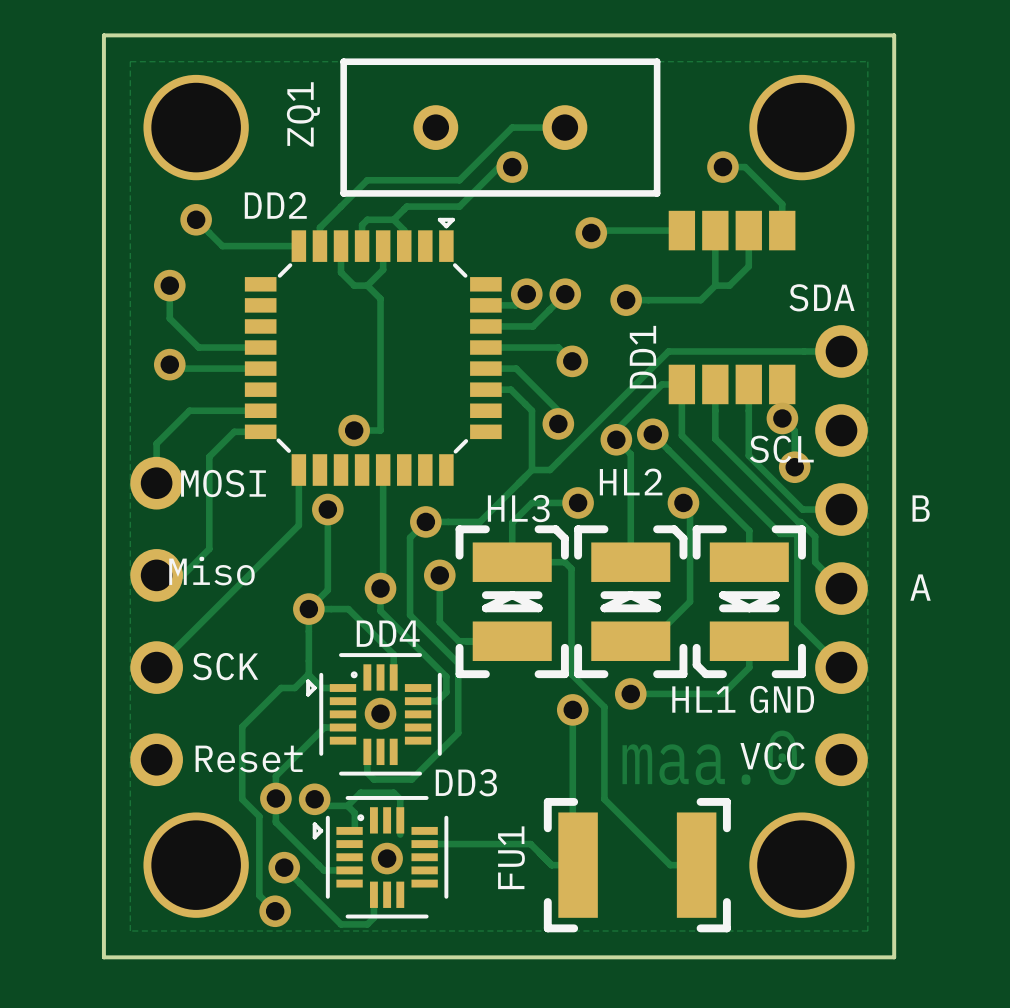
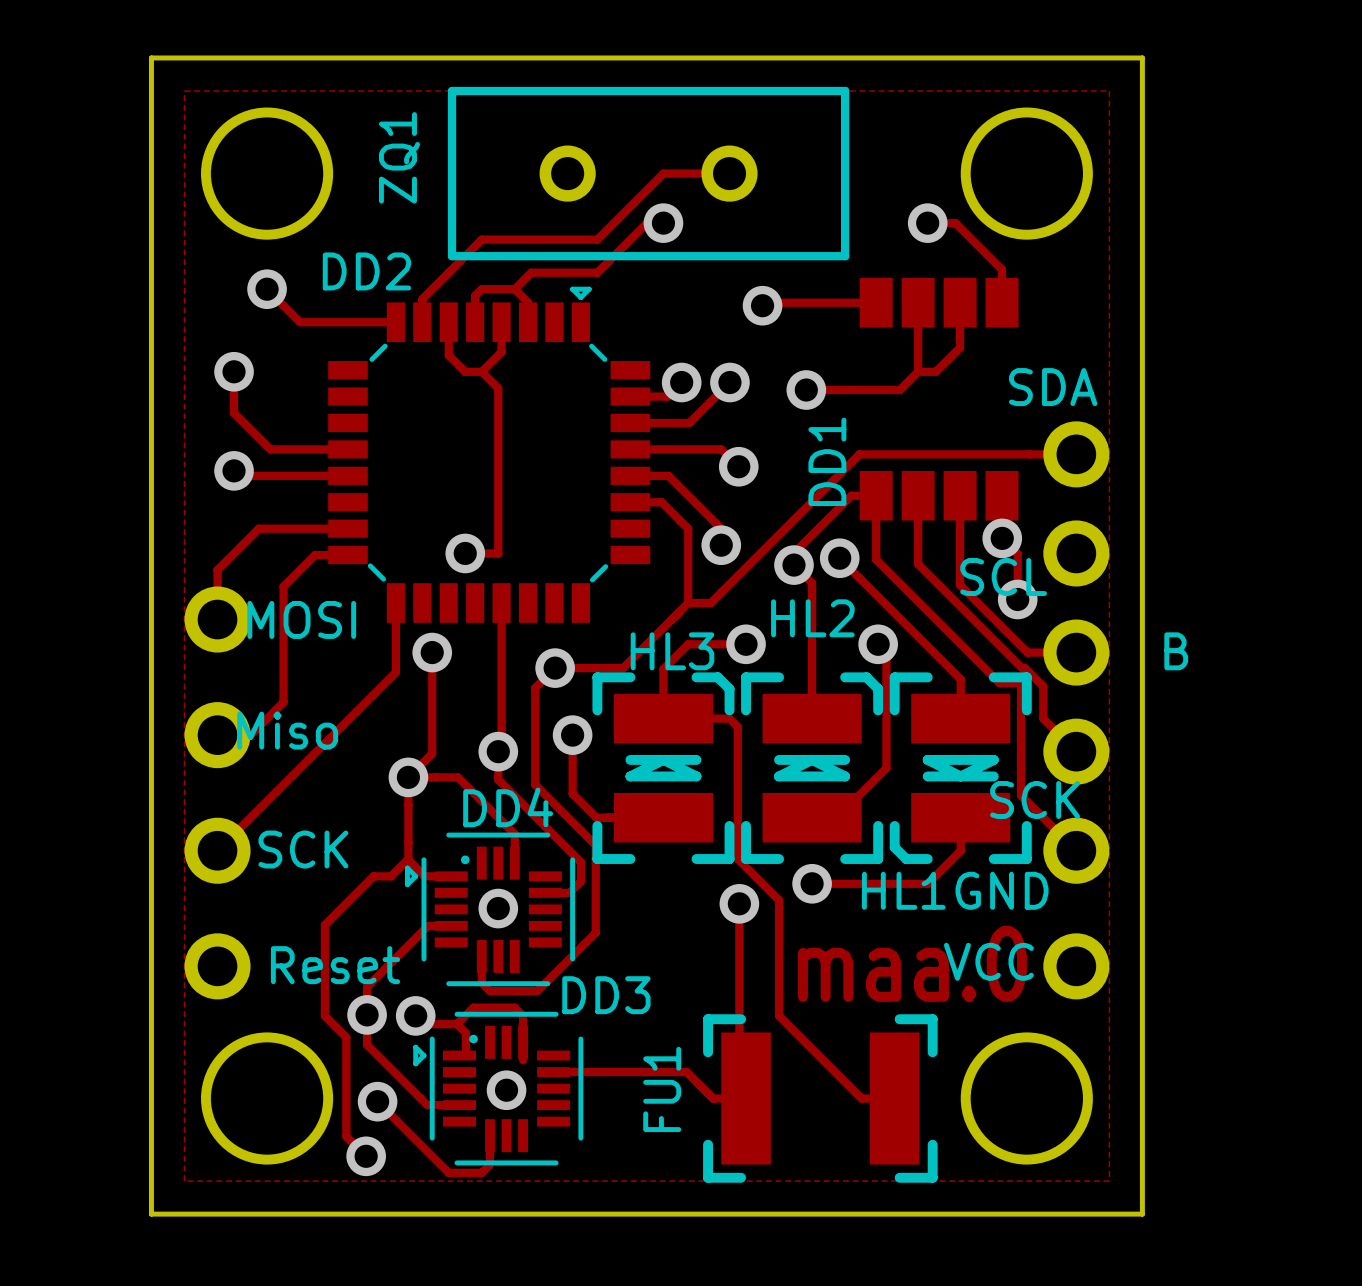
part value: A (920, 587) -> SCK (1035, 799)

